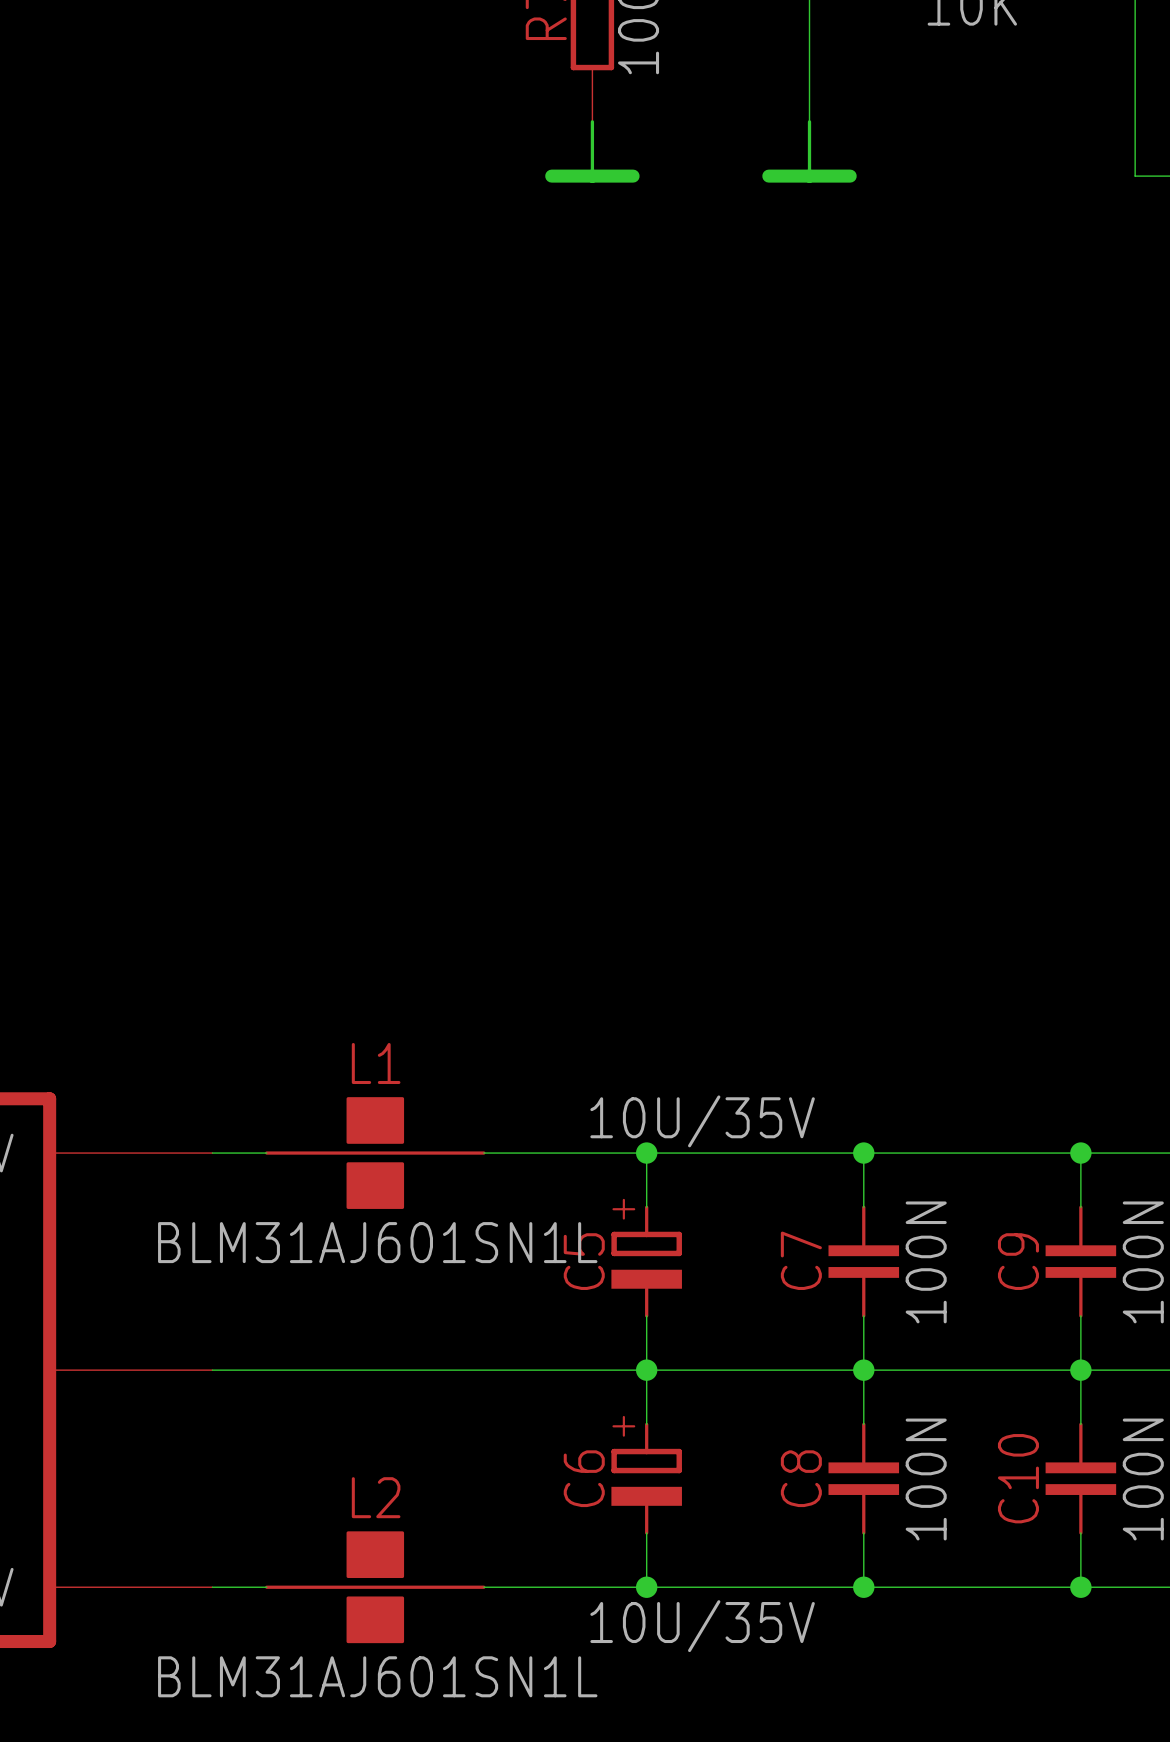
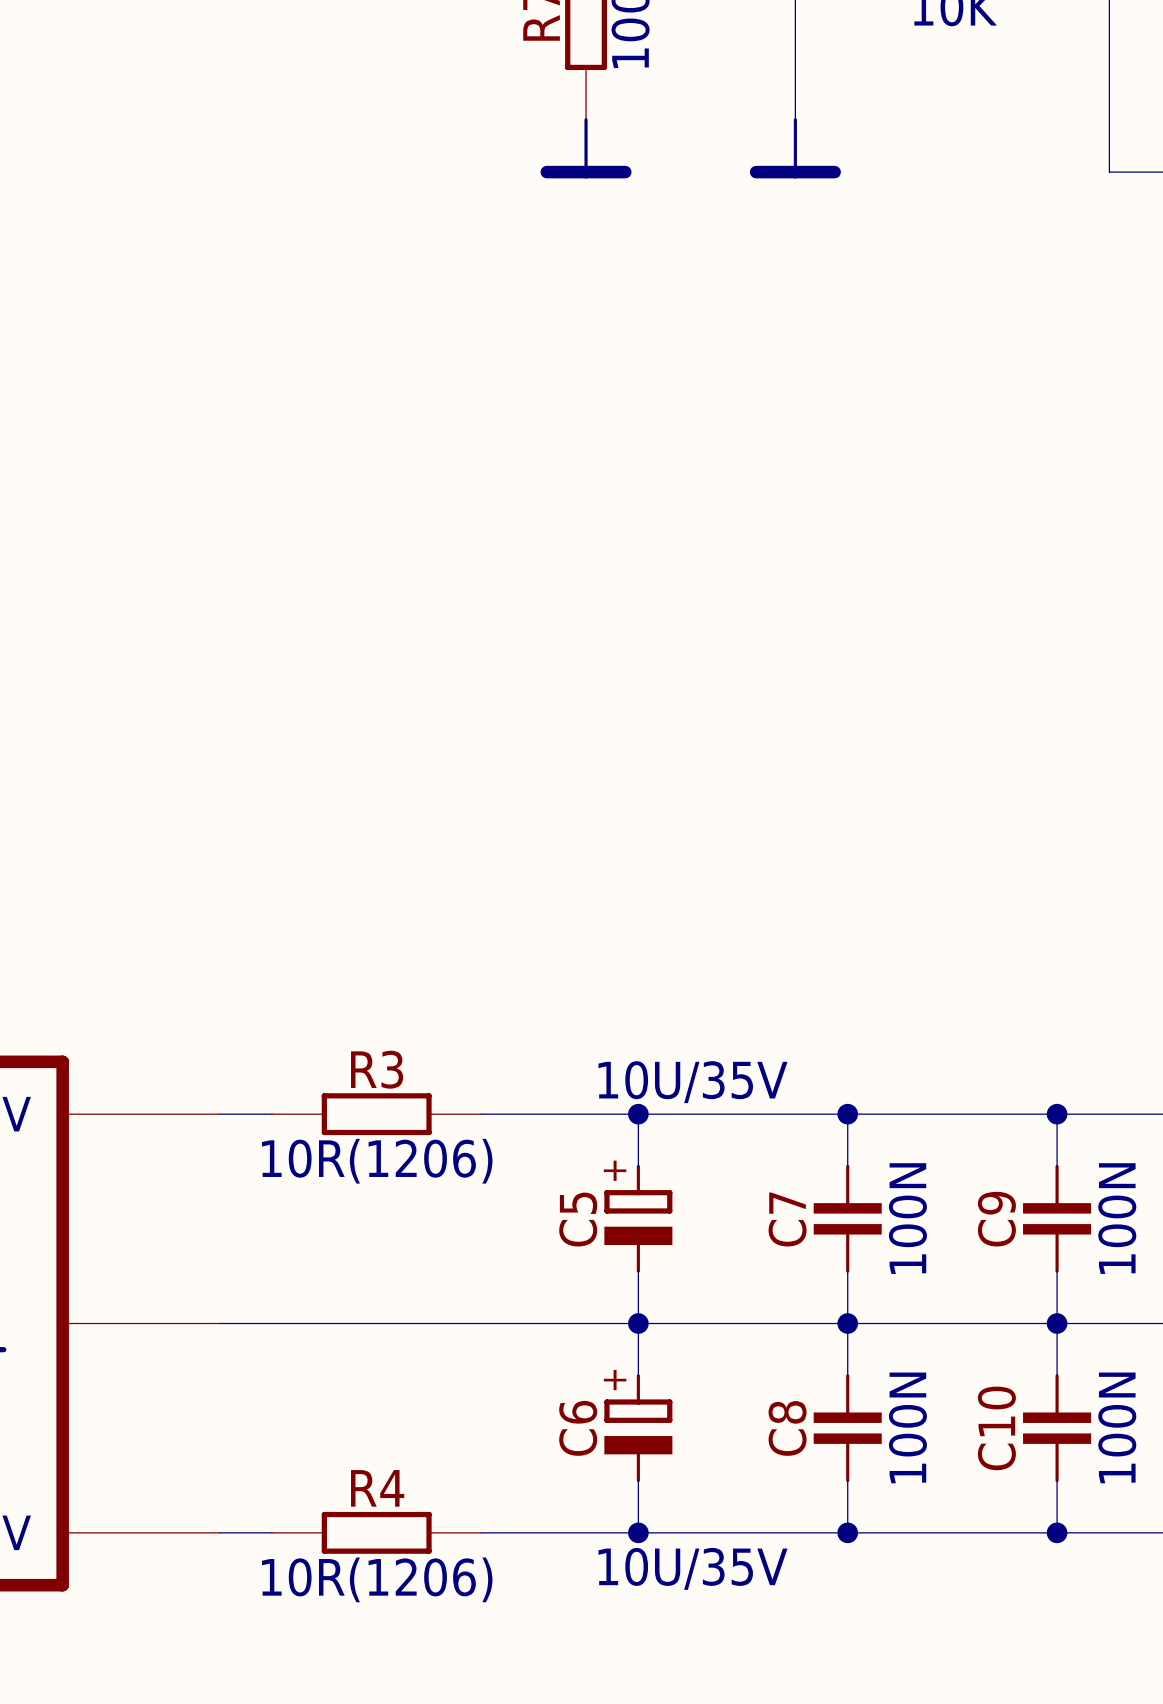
L1: BLM31AJ601SN1L (375, 1153) -> none
R3: none -> 10R(1206) (376, 1114)
L2: BLM31AJ601SN1L (375, 1587) -> none
R4: none -> 10R(1206) (376, 1532)

